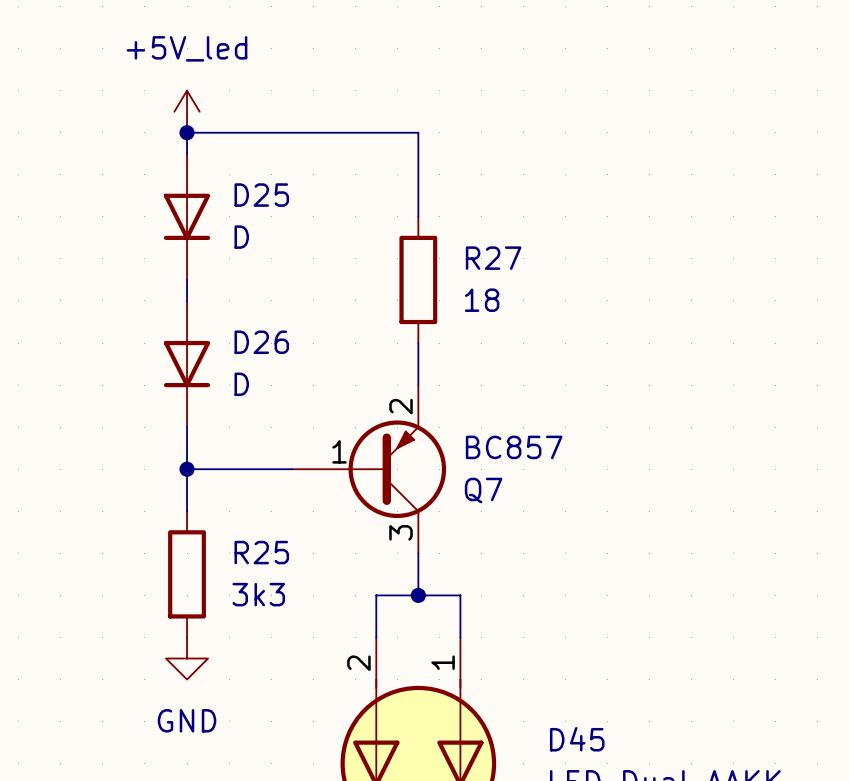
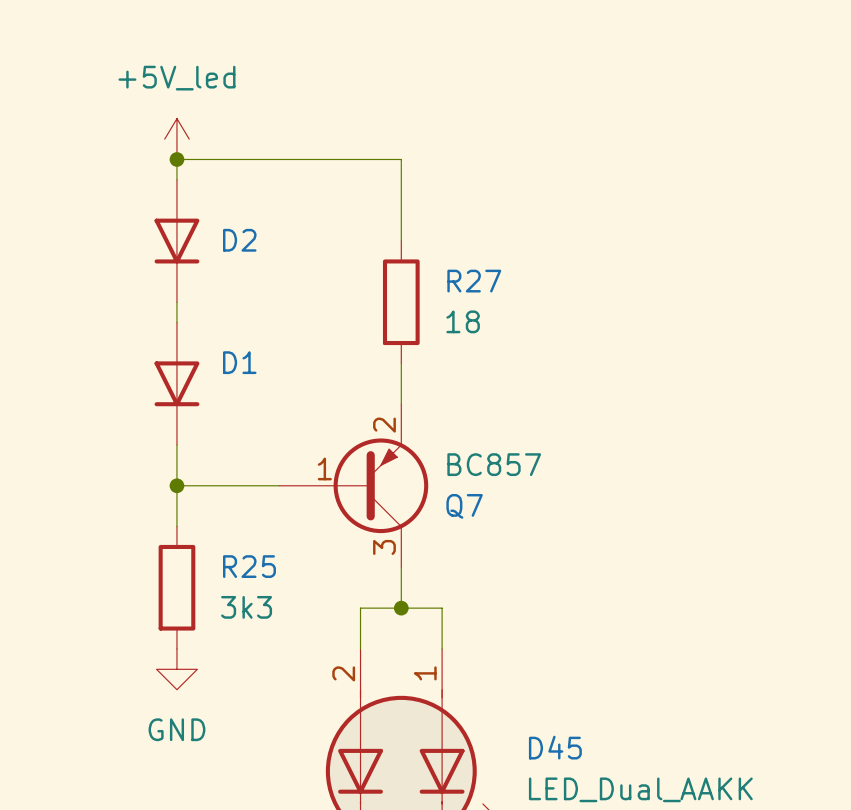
D25 name: D25 (261, 195) -> D2 (239, 240)
D25 value: D (241, 237) -> none
D26 name: D26 (261, 342) -> D1 (239, 362)
D26 value: D (241, 384) -> none

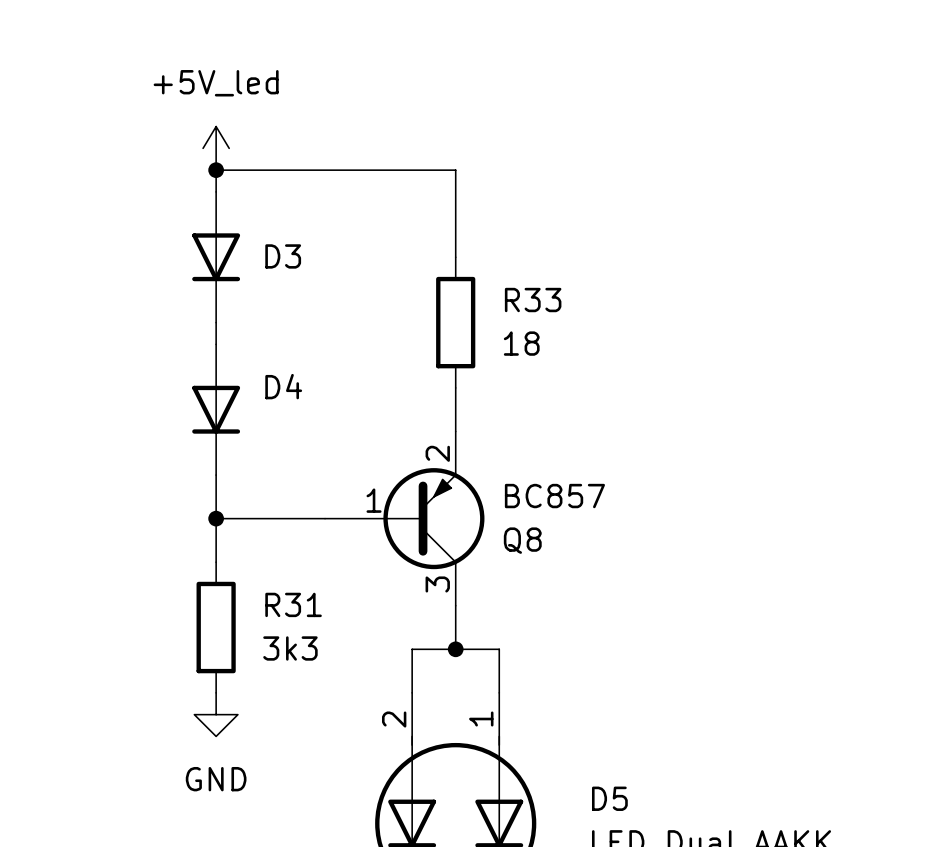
D2 name: D2 (239, 240) -> D3 (283, 256)
R27 name: R27 (474, 281) -> R33 (533, 300)
D1 name: D1 (239, 362) -> D4 (283, 386)
Q7 name: Q7 (464, 506) -> Q8 (522, 540)
R25 name: R25 (249, 566) -> R31 (293, 604)
D45 name: D45 (555, 747) -> D5 (609, 798)

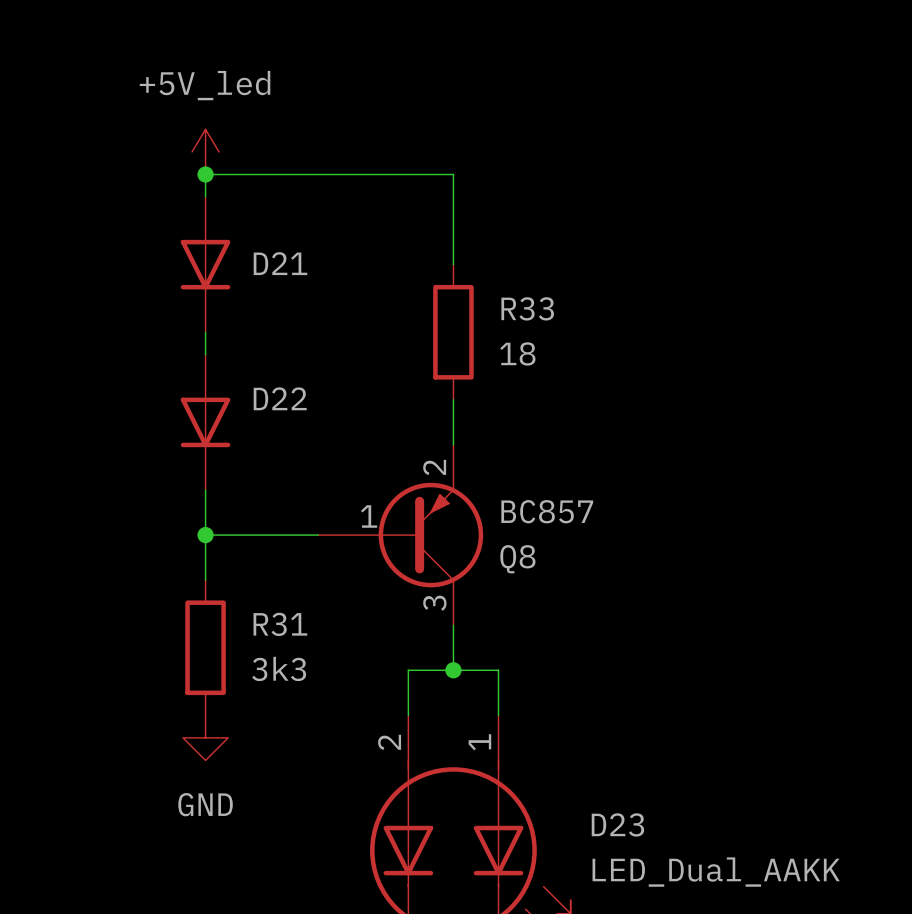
D3 name: D3 (283, 256) -> D21 (280, 263)
D4 name: D4 (283, 386) -> D22 (280, 398)
D5 name: D5 (609, 798) -> D23 (617, 824)

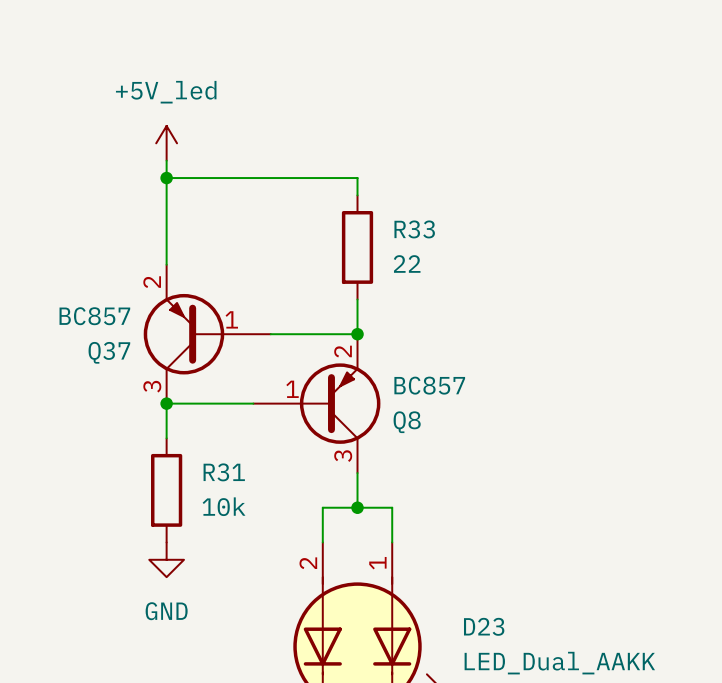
power symbol position: +5V_led (205, 151) -> +5V_led (166, 143)
junction position: (205, 174) -> (166, 178)
wire: (205, 197) (205, 174) (453, 174) (453, 242) -> (166, 178) (357, 178)
D21: (205, 264) -> none
R33 value: 18 (517, 353) -> 22 (407, 263)
D22: (205, 422) -> none
Q37: none -> BC857 (207, 334)
wire: none -> (270, 334) (357, 334)
junction: none -> (357, 334)
R31 value: 3k3 (279, 668) -> 10k (224, 506)

